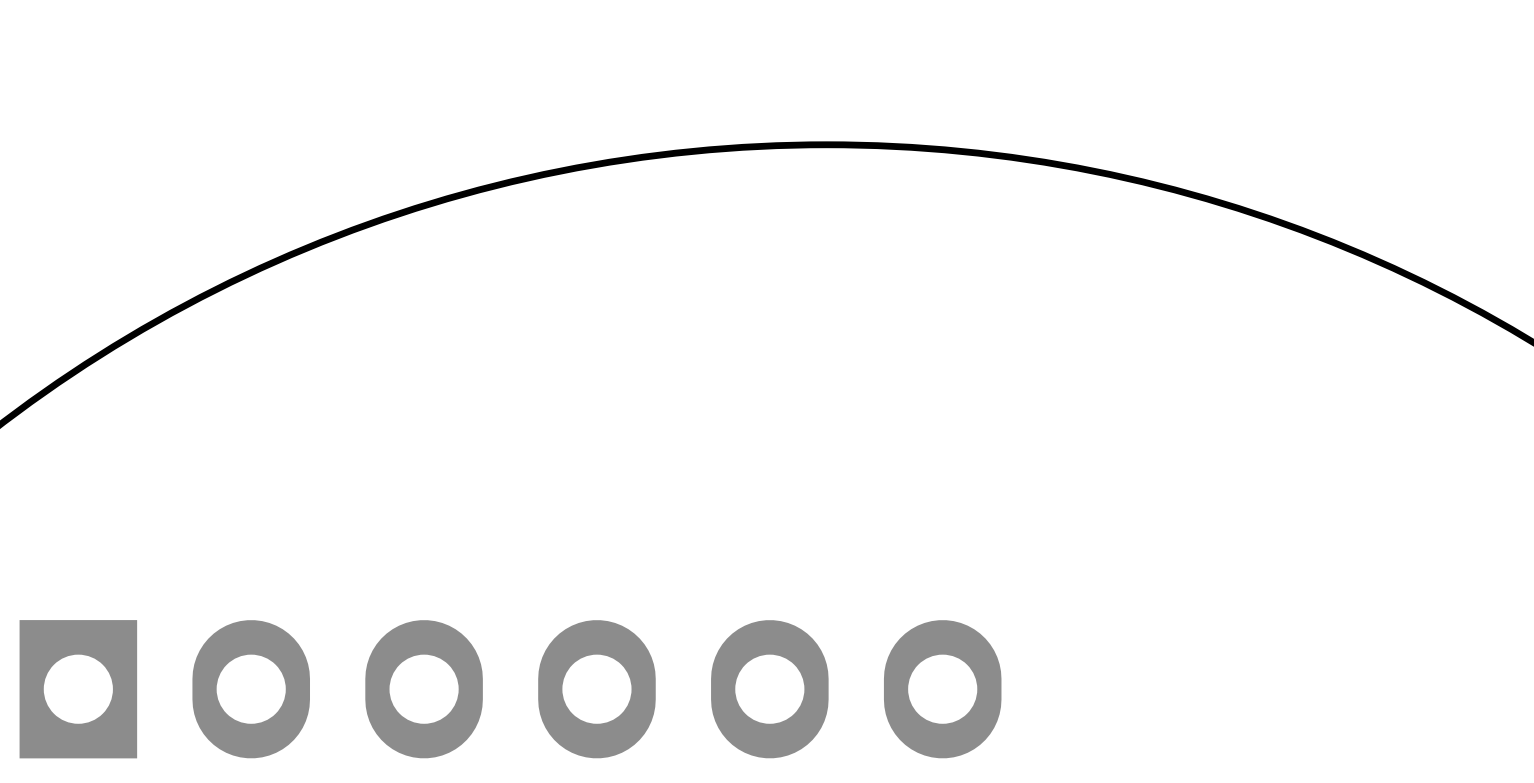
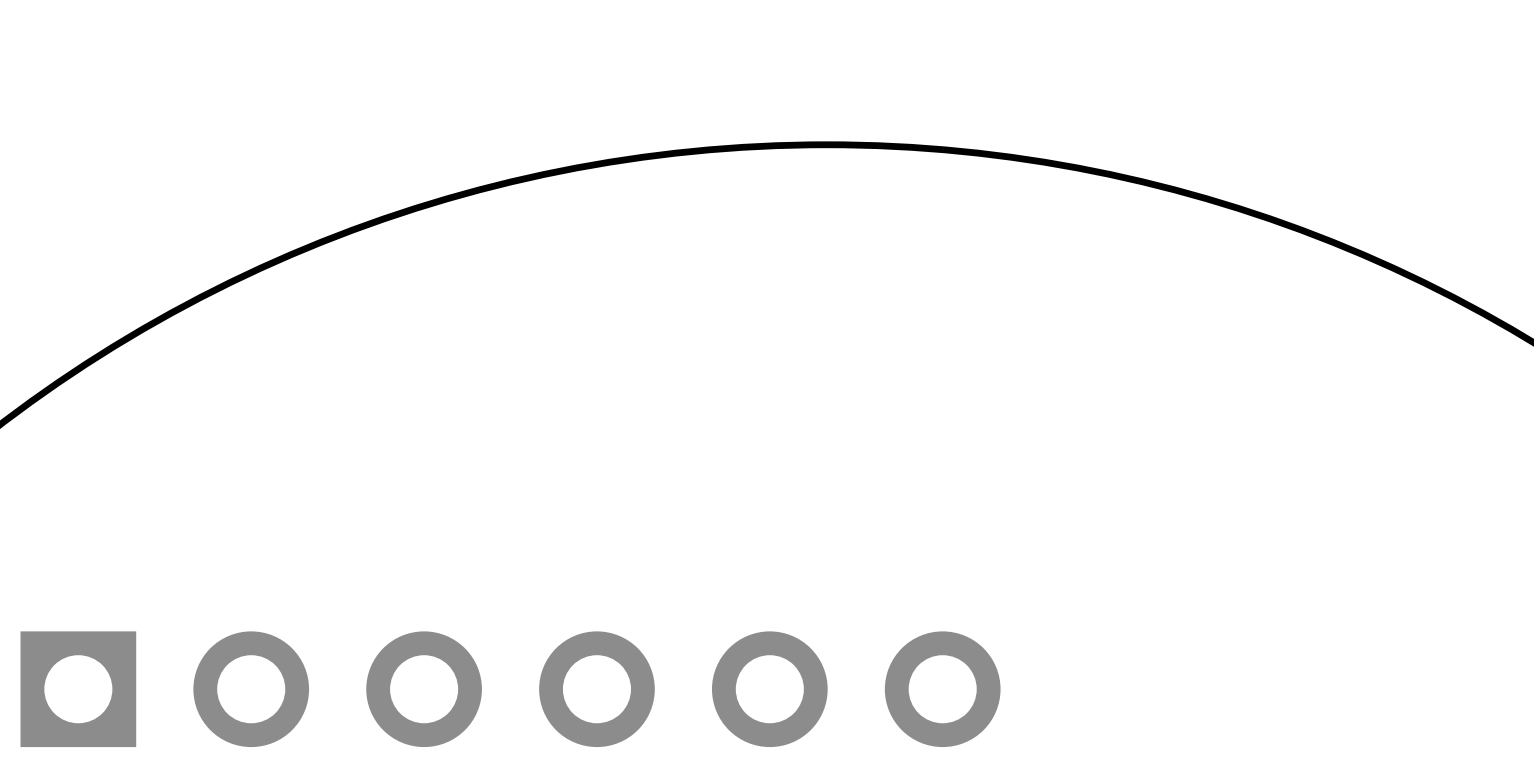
part footprint: [19, 620, 1002, 759] -> [20, 631, 1001, 748]

